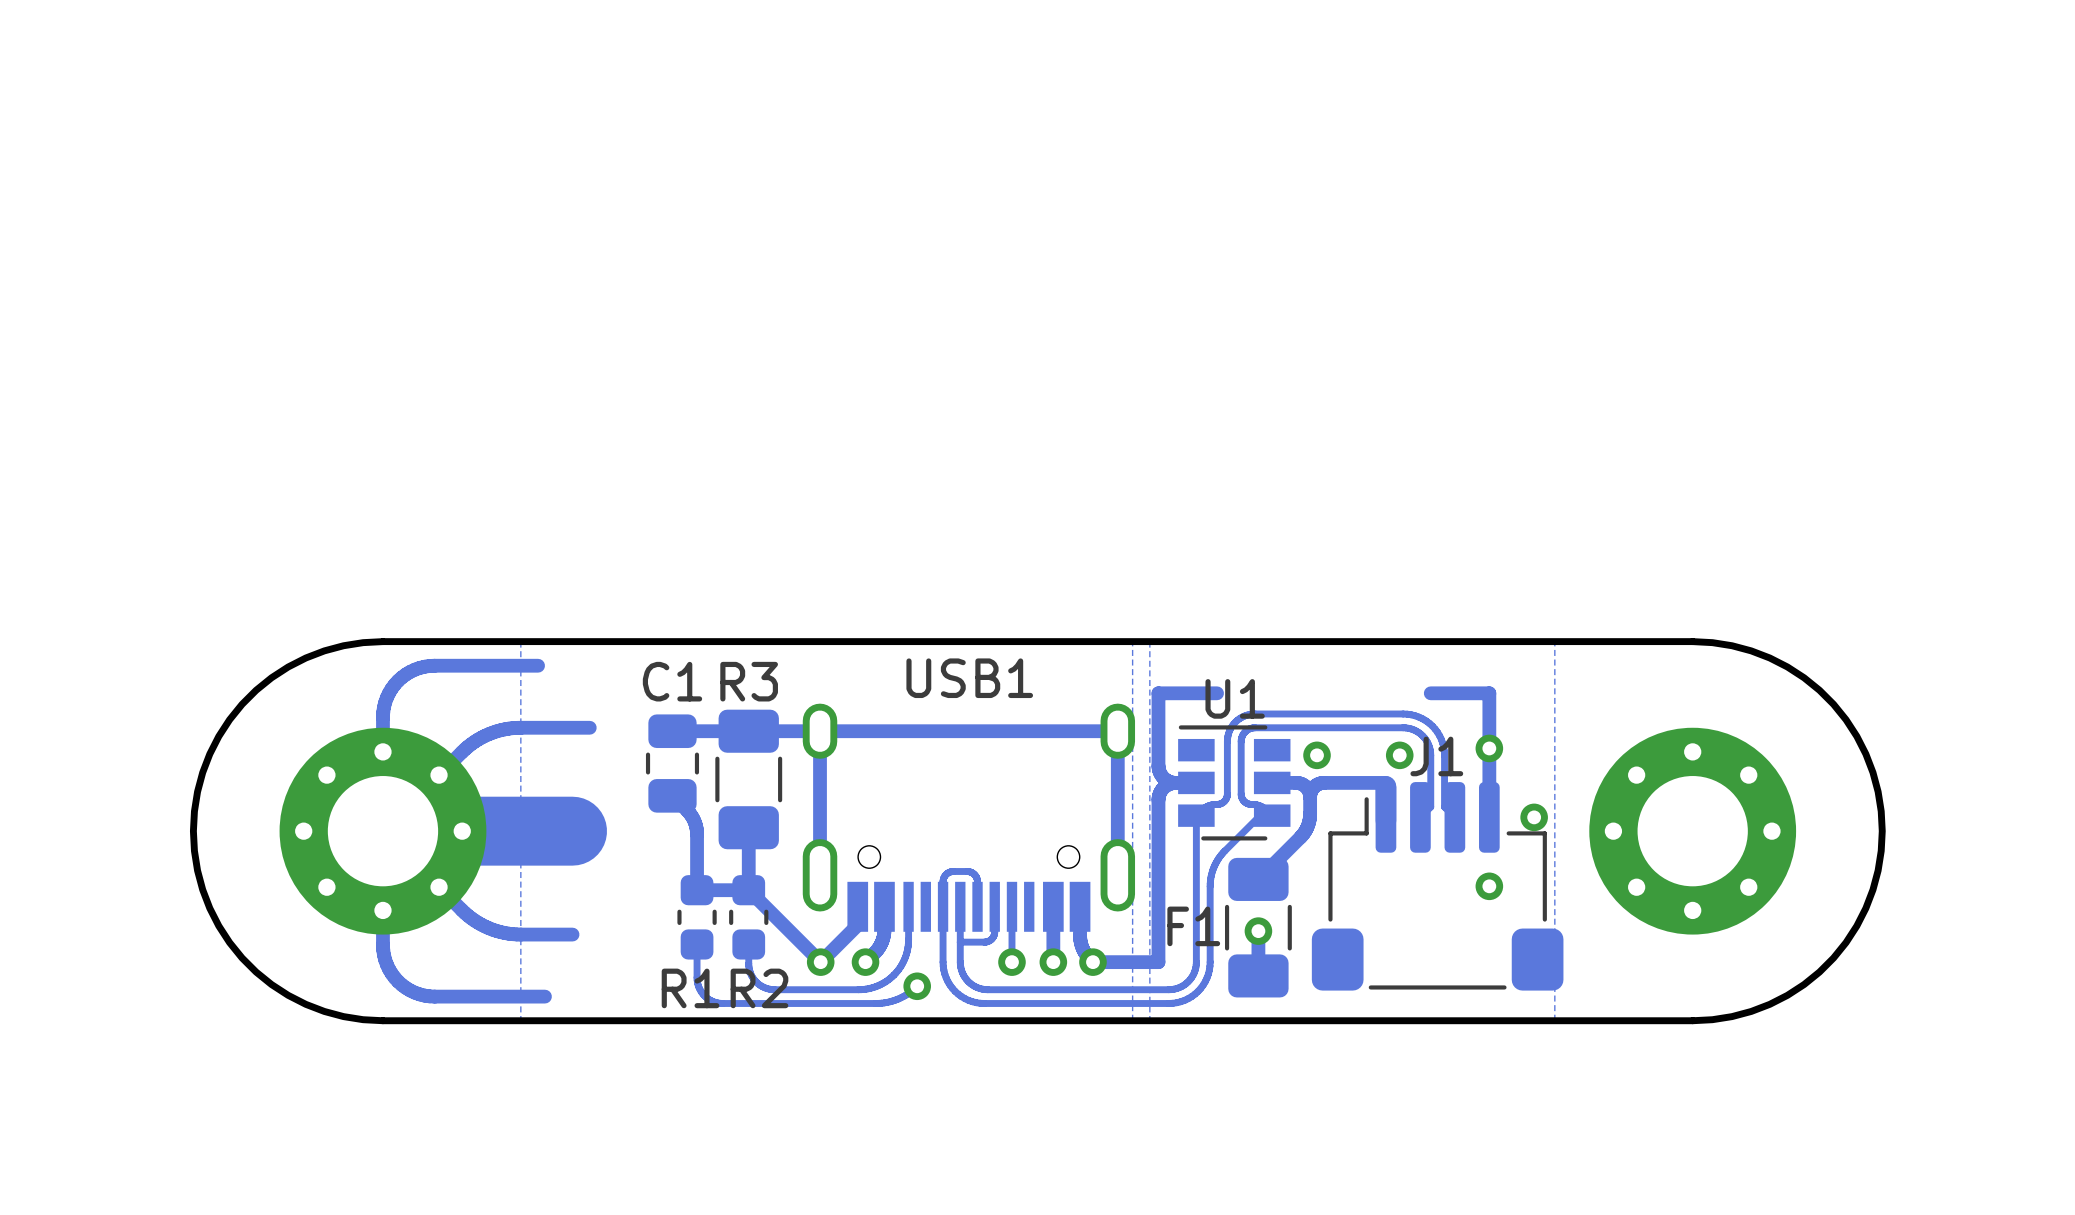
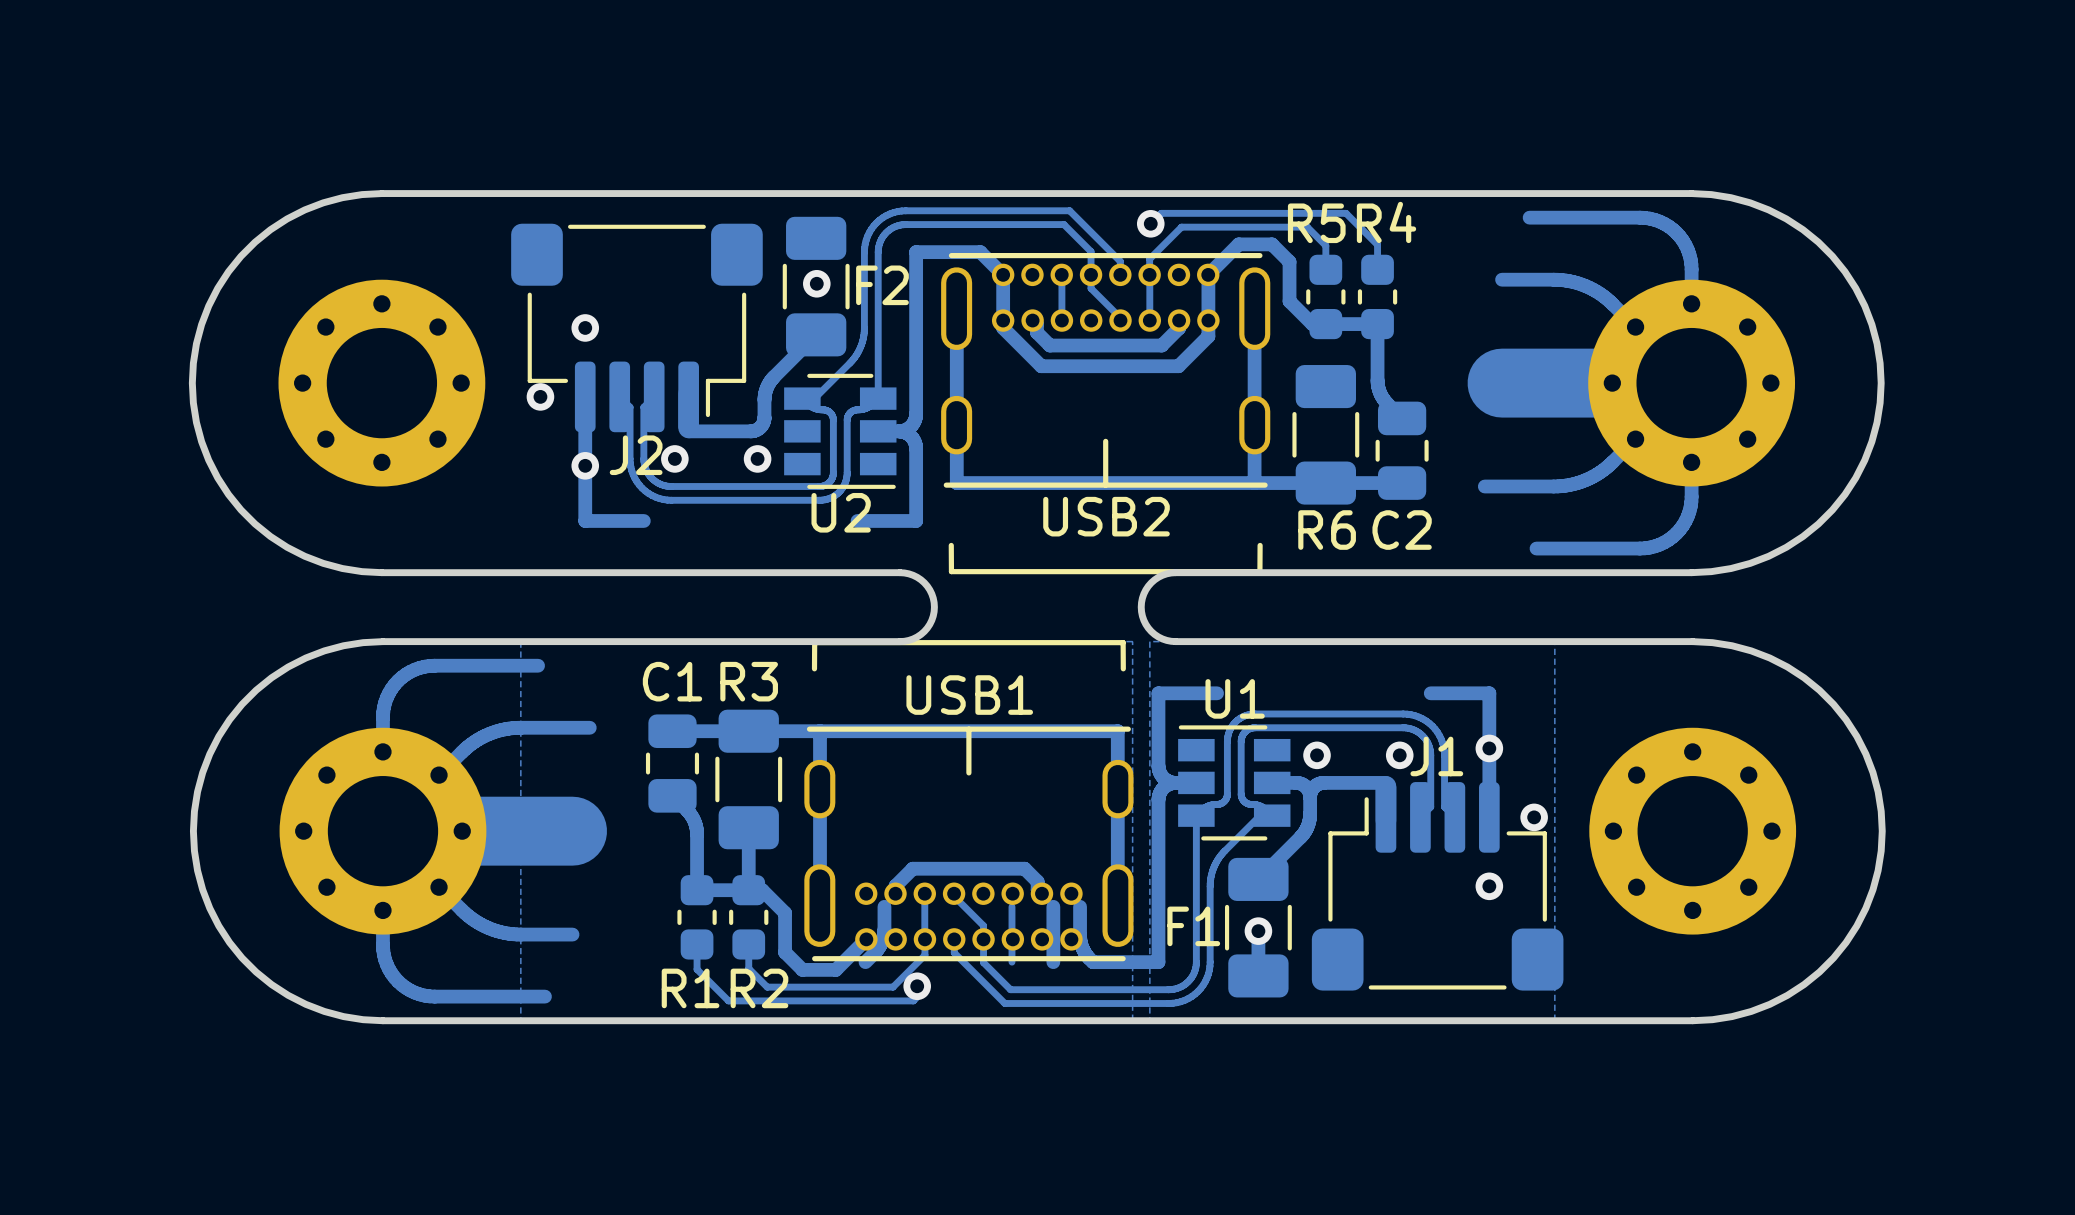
track: none -> (1529, 217) (1639, 217) (1654, 219) (1668, 226) (1682, 240) (1689, 254) (1691, 269) (1691, 496) (1685, 521) (1668, 539) (1650, 547) (1536, 548)
track: none -> (1150, 223) (1161, 213) (1346, 213) (1377, 244) (1377, 269)
via: none -> (1150, 223)
track: none -> (905, 224) (897, 225) (888, 230) (879, 244) (878, 398) (869, 406) (853, 410) (847, 416) (846, 478) (842, 488) (834, 495) (819, 500) (671, 500) (655, 497) (642, 488) (633, 474) (630, 458) (630, 407) (619, 396)
track: none -> (906, 224) (1063, 224) (1091, 251) (1091, 288) (1120, 317) (1120, 320)
track: none -> (1325, 269) (1325, 245) (1307, 227) (1181, 227) (1149, 259) (1149, 274)
track: none -> (1120, 274) (1120, 261) (1069, 210) (905, 210) (893, 212) (882, 217) (871, 229) (865, 244) (864, 330) (859, 349) (851, 361) (814, 398) (802, 398) (813, 407) (828, 411) (833, 418) (833, 474) (830, 481) (823, 485) (671, 486) (658, 483) (647, 471) (643, 458) (643, 407) (654, 396)
track: none -> (1208, 274) (1238, 244) (1272, 244) (1289, 261) (1289, 301) (1312, 324) (1377, 324) (1378, 388) (1384, 399) (1402, 418)
track: none -> (1061, 275) (1061, 320)
track: none -> (1149, 275) (1149, 320)
track: none -> (1208, 275) (1208, 336) (1178, 366) (1041, 366) (1003, 328) (1003, 274) (980, 252) (916, 252) (916, 415) (911, 426) (900, 431)
track: none -> (1502, 279) (1561, 280) (1577, 283) (1592, 289) (1609, 301) (1691, 383)
via: none -> (816, 283)
F2: none -> (816, 286)
R5: none -> (1325, 296)
R4: none -> (1377, 296)
track: none -> (1179, 320) (1179, 328) (1161, 345) (1049, 345) (1036, 332) (1036, 324) (1033, 320)
via: none -> (585, 327)
J2: none -> (636, 327)
track: none -> (816, 334) (769, 383) (764, 395) (764, 417)
track: none -> (956, 338) (956, 483) (1402, 483)
track: none -> (1254, 338) (1254, 483)
part: none -> (381, 383)
track: none -> (1691, 383) (1609, 464) (1589, 478) (1561, 486) (1484, 486)
track: none -> (1691, 383) (1502, 383)
part: none -> (1691, 383)
via: none -> (540, 396)
track: none -> (585, 396) (585, 520) (643, 520)
USB2: none -> (1105, 413)
track: none -> (764, 418) (761, 426) (753, 431) (688, 431)
U2: none -> (840, 431)
track: none -> (900, 431) (911, 436) (915, 445) (916, 520) (857, 520)
R6: none -> (1325, 434)
C2: none -> (1402, 450)
via: none -> (674, 458)
via: none -> (757, 458)
via: none -> (585, 465)
board edge: (1175, 641) (899, 641) -> (1175, 641) (1162, 638) (1151, 631) (1143, 620) (1141, 607) (1143, 593) (1151, 582) (1158, 577) (1171, 572) (1691, 572) (1731, 568) (1768, 556) (1803, 536) (1832, 509) (1855, 477) (1864, 460) (1877, 422) (1881, 383) (1877, 343) (1864, 306) (1844, 271) (1832, 256) (1803, 229) (1786, 218) (1750, 202) (1731, 197) (1691, 193) (362, 194) (323, 202) (287, 218) (270, 229) (241, 256) (228, 271) (208, 306) (196, 343) (192, 383) (196, 422) (208, 460) (228, 494) (255, 523) (287, 547) (304, 556) (342, 568) (381, 572) (904, 572) (917, 577) (927, 586) (933, 598) (934, 611) (929, 624) (920, 634) (913, 638) (899, 641)
USB1 footprint: [802, 703, 1136, 932] -> [804, 640, 1134, 962]
track: (748, 890) (820, 962) (857, 925) (857, 906) -> (748, 890) (762, 890) (785, 912) (785, 952) (802, 969) (835, 969) (866, 939)
track: none -> (924, 893) (924, 939)
track: none -> (1041, 893) (1037, 889) (1037, 881) (1024, 868) (912, 868) (895, 886) (895, 893)
track: (908, 906) (907, 949) (902, 963) (893, 975) -> none
track: (960, 906) (960, 964) (964, 977) (970, 983) (979, 988) (1010, 989) -> (954, 893) (954, 896) (983, 925) (983, 962) (1010, 989)
track: (977, 906) (977, 880) (974, 874) (967, 871) (952, 871) (946, 874) (943, 881) (943, 962) (944, 974) (952, 988) (964, 998) (980, 1003) (1004, 1003) -> (954, 939) (954, 952) (1004, 1003)
track: (994, 906) (994, 932) (991, 939) (985, 942) (960, 942) -> none
via: (820, 962) -> none
via: (865, 962) -> none
via: (1011, 962) -> none
via: (1053, 962) -> none
via: (1092, 962) -> none
track: (748, 963) (750, 973) (756, 982) (772, 989) (863, 989) (879, 984) (893, 975) -> (748, 963) (748, 968) (767, 987) (893, 987) (924, 955) (924, 939)
track: (697, 969) (697, 982) (701, 992) (708, 999) (720, 1003) (881, 1003) (900, 997) (917, 986) -> (697, 969) (728, 1000) (913, 1000) (923, 990)

